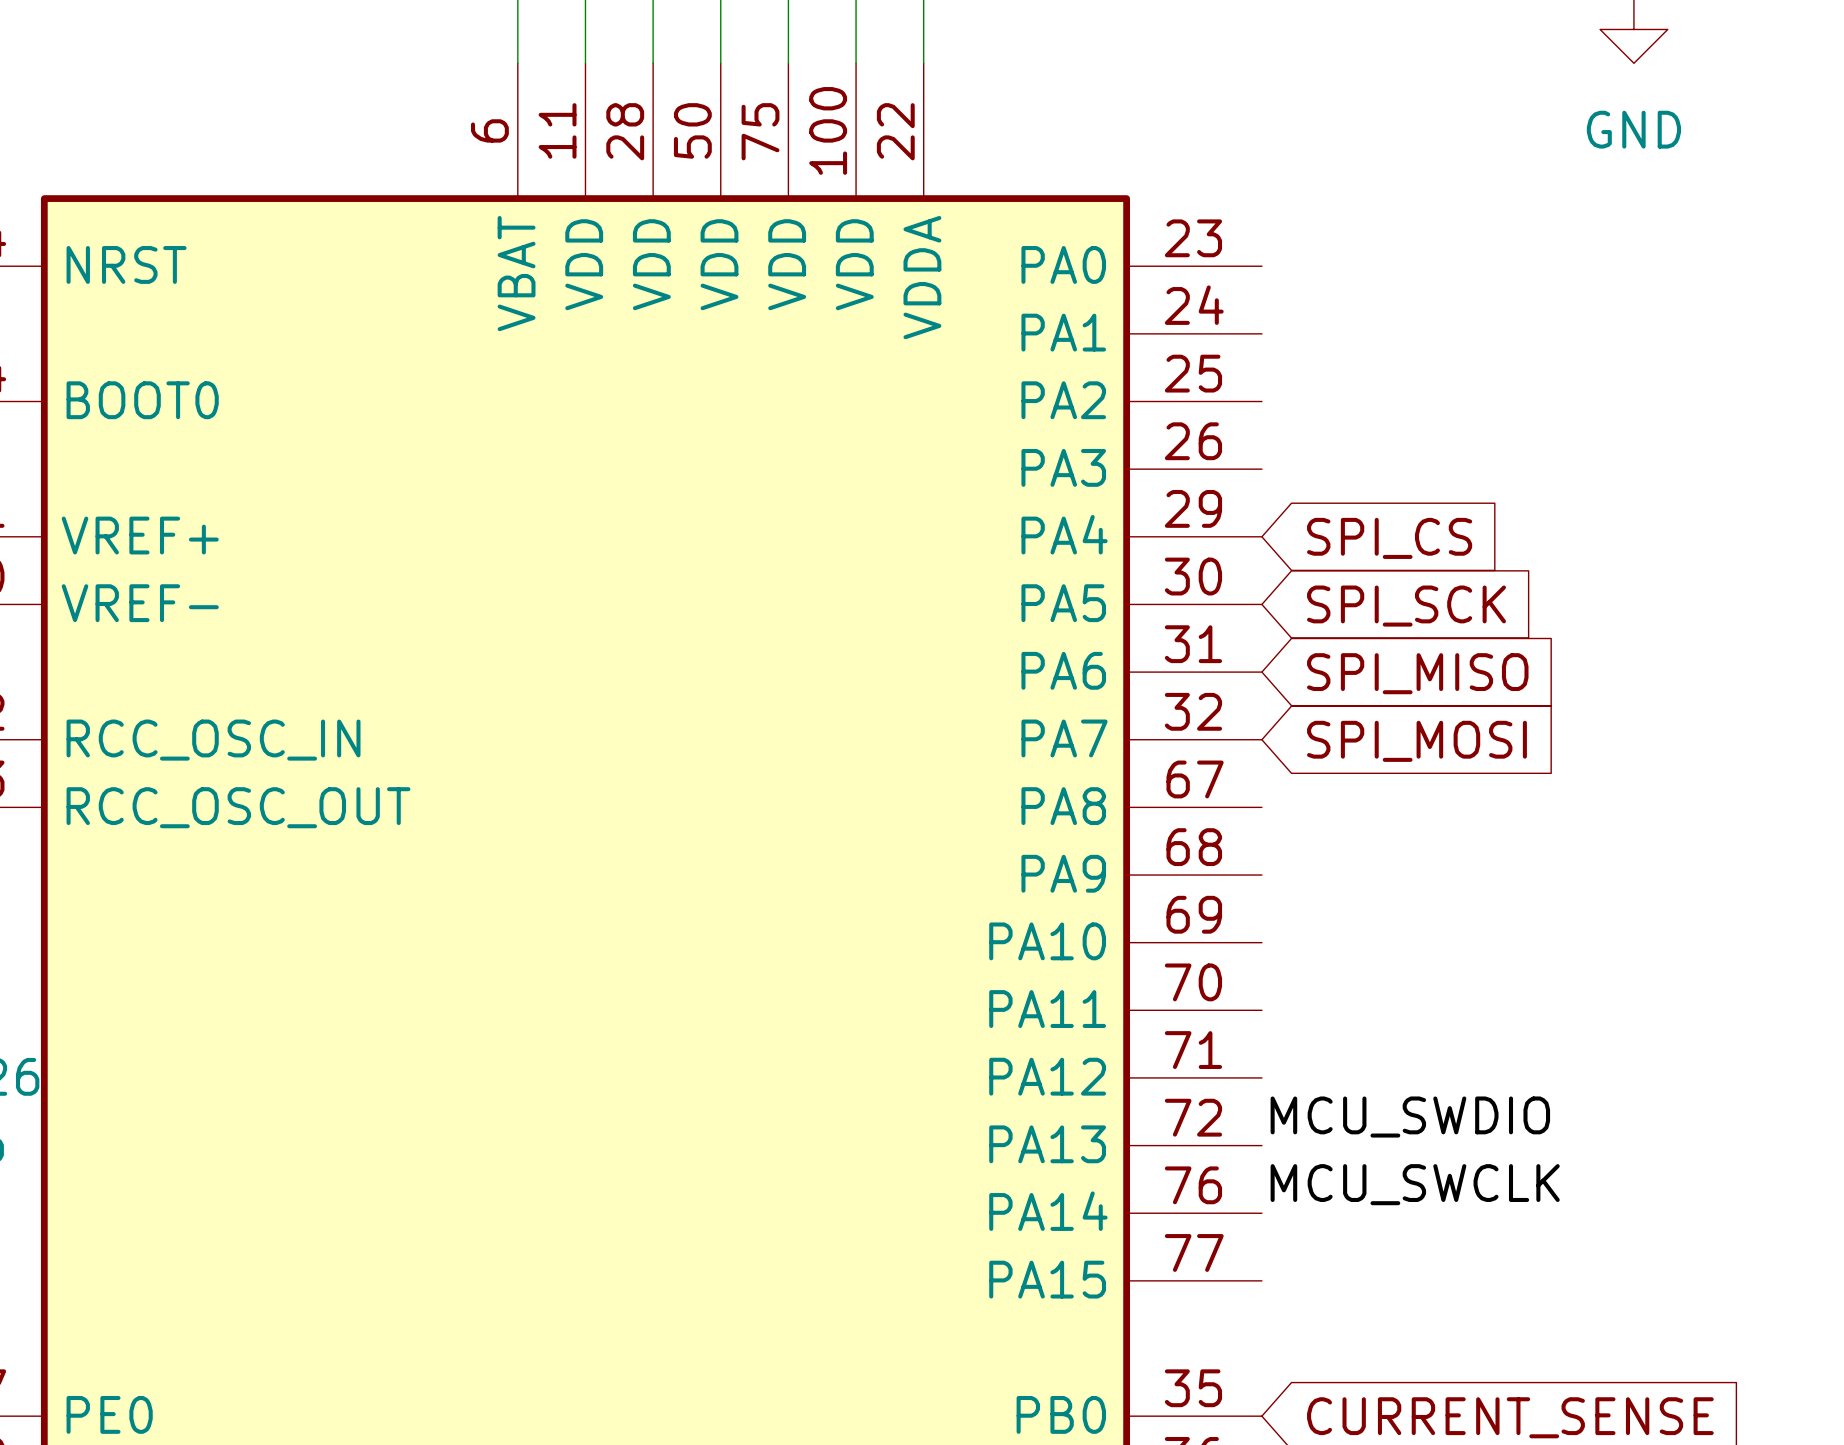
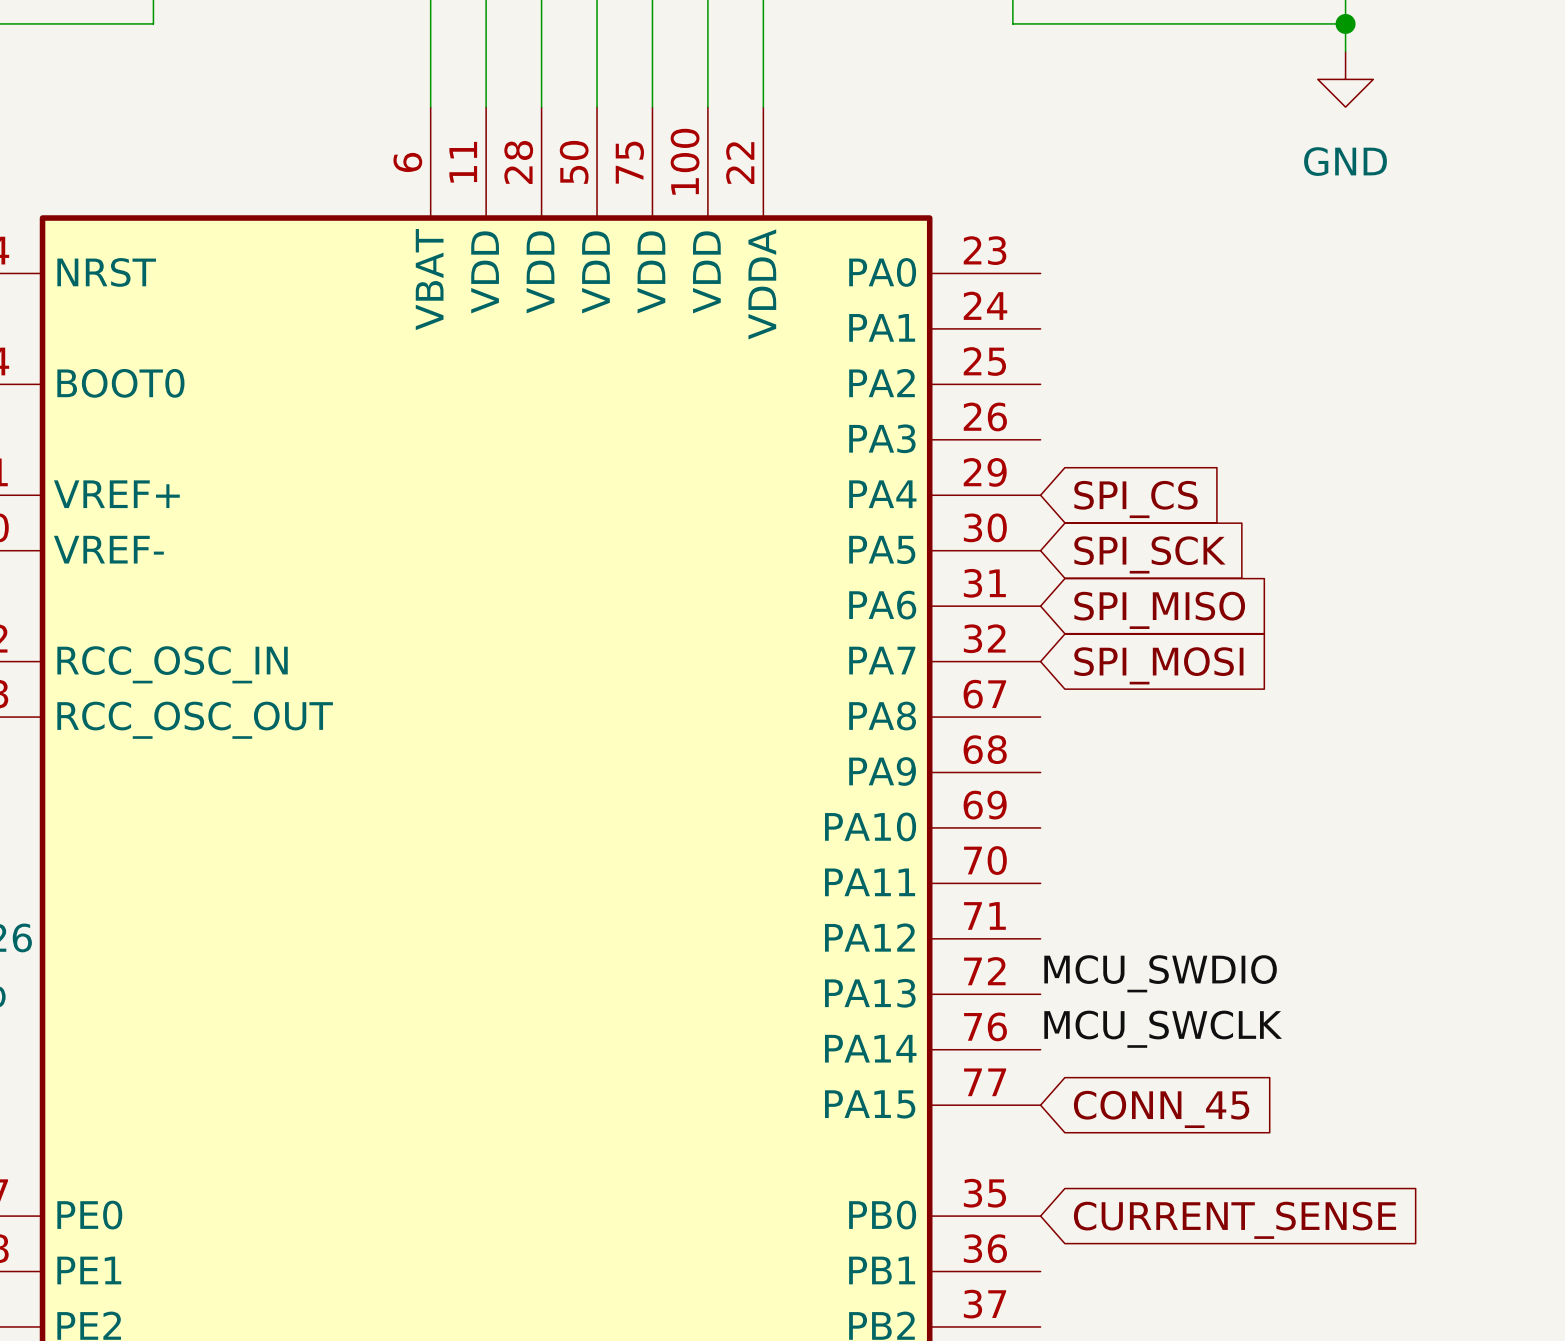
global label: none -> CONN_45 (1161, 1109)

